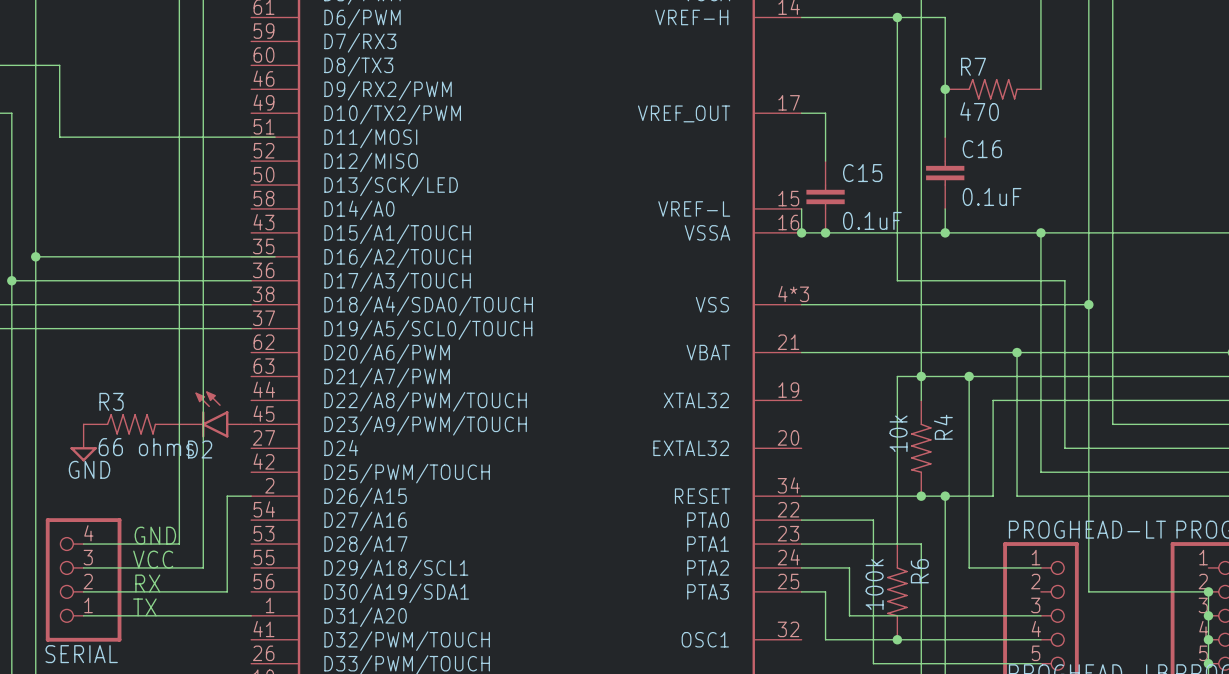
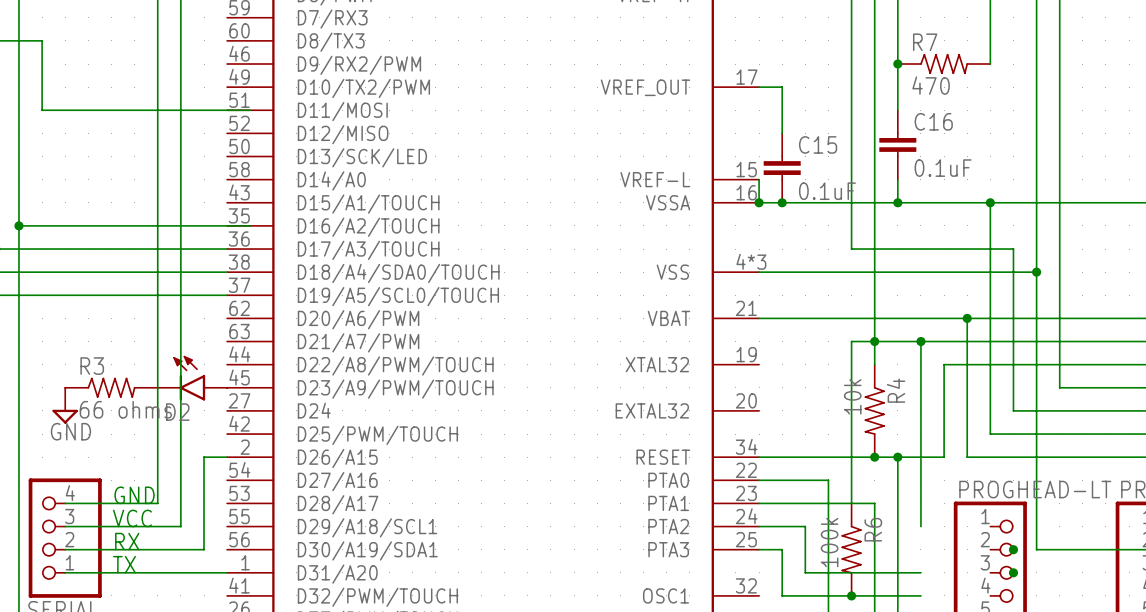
wire: (969, 567) (1040, 567) -> none
junction: none -> (1013, 549)
wire: (969, 615) (1040, 615) -> none
junction: none -> (1013, 572)
wire: (969, 639) (1040, 639) -> none

